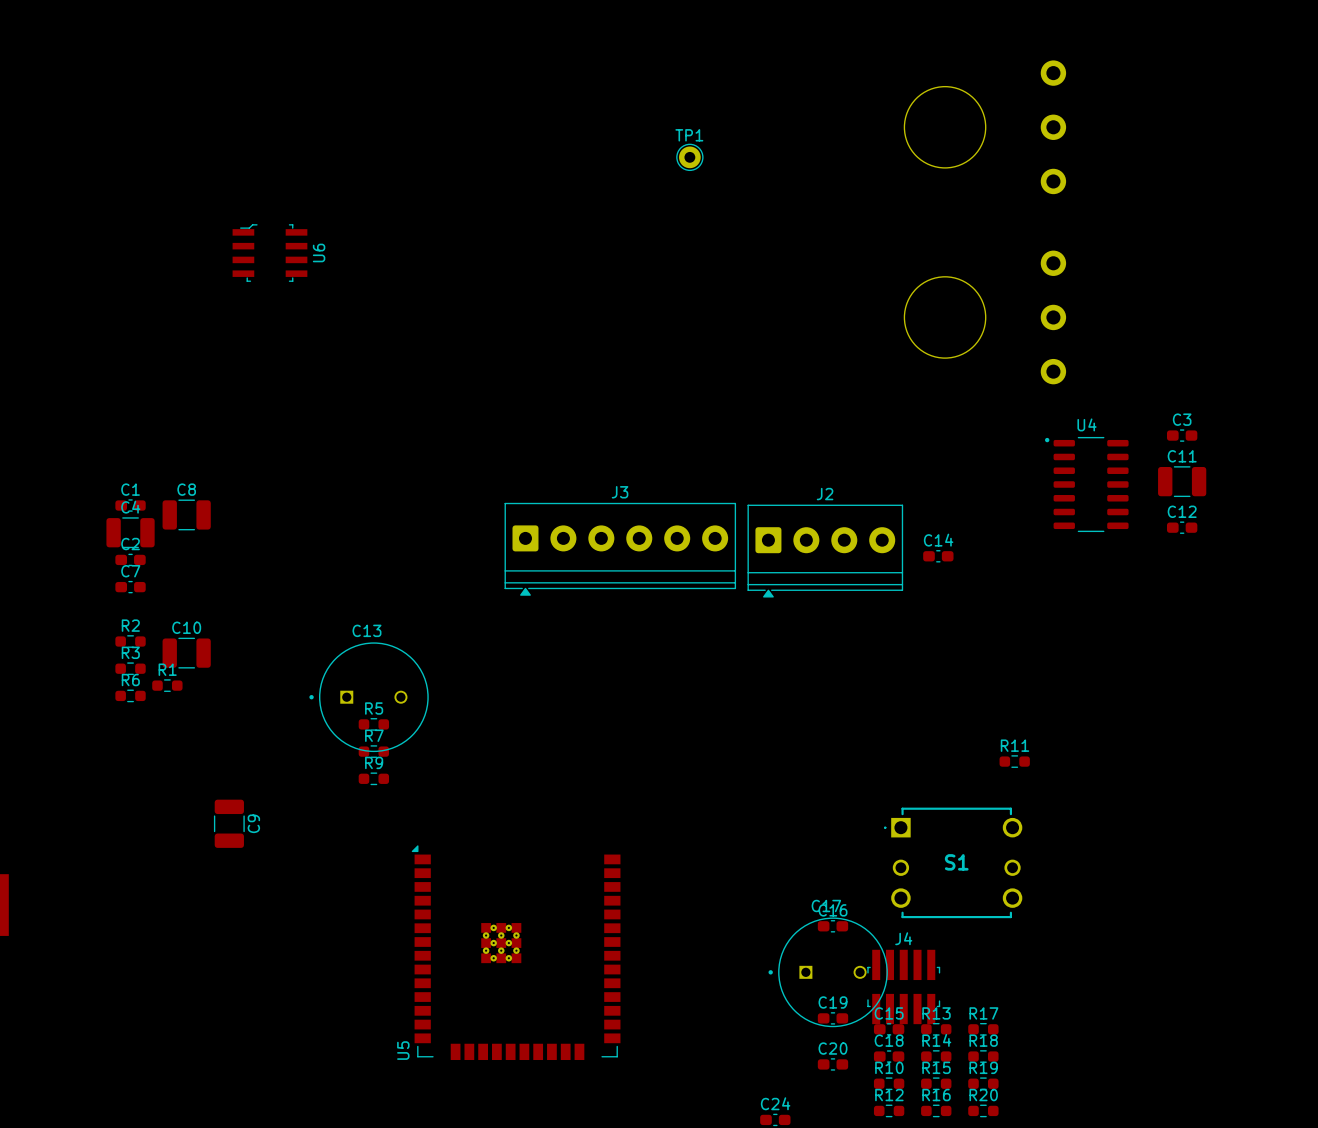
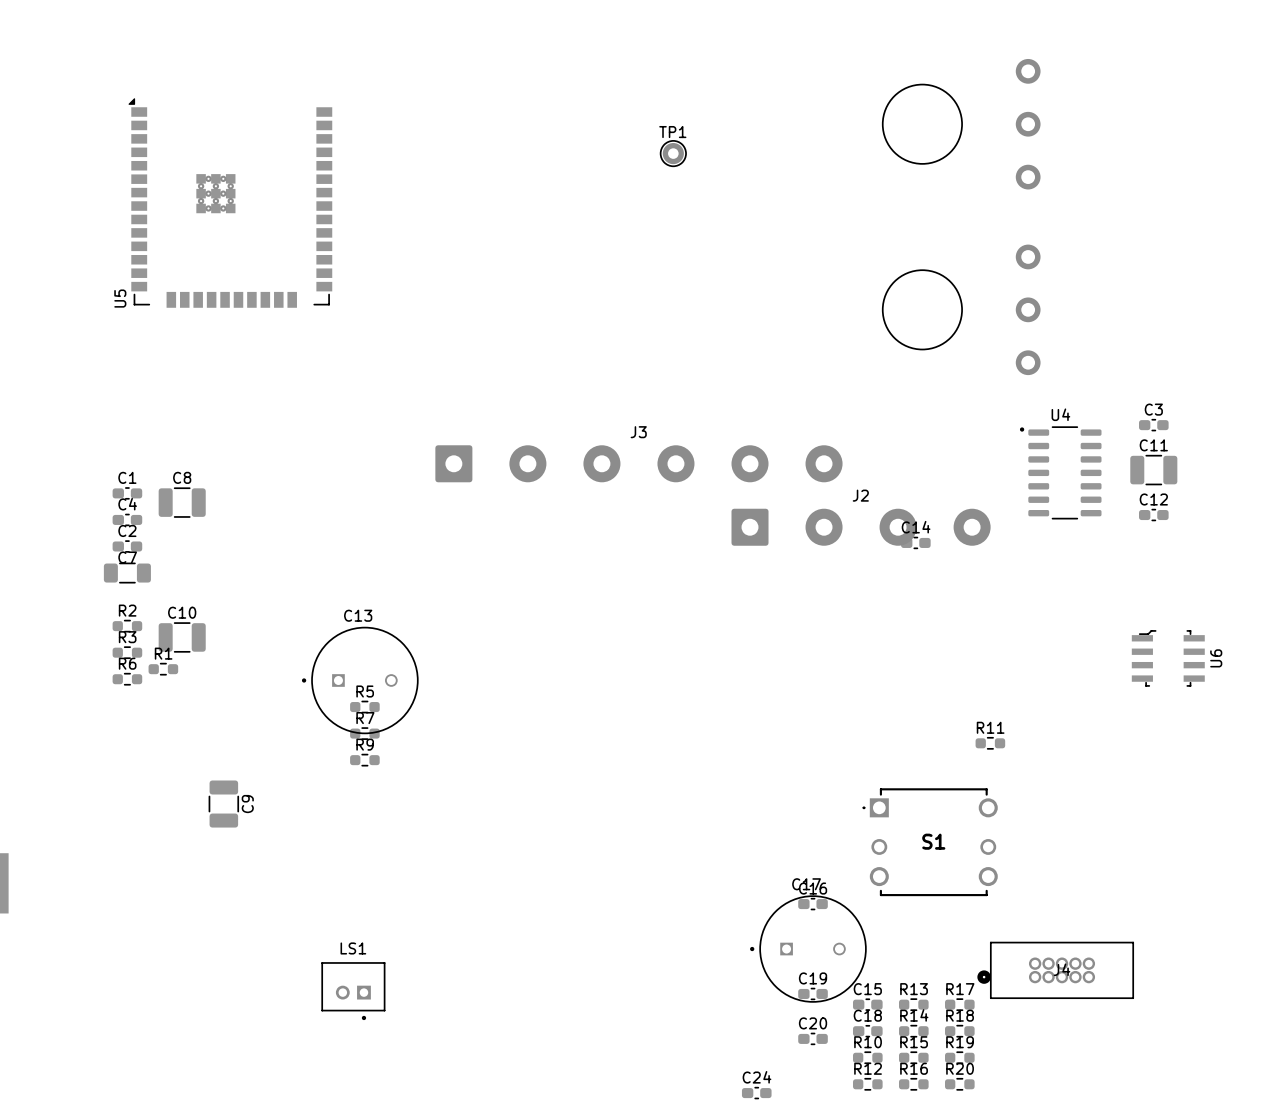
U6 position: (269, 253) -> (1168, 658)
J3 name position: J3 (620, 492) -> J3 (638, 432)
J2 name position: J2 (825, 494) -> J2 (860, 495)
J3 footprint: [504, 502, 737, 596] -> [435, 445, 843, 483]
J2 footprint: [747, 504, 904, 598] -> [731, 508, 991, 546]
C4 footprint: [106, 517, 155, 549] -> [112, 513, 143, 526]
C7 footprint: [115, 580, 146, 594] -> [103, 562, 151, 584]
J4 name position: J4 (903, 938) -> J4 (1062, 969)
J4 footprint: [867, 949, 941, 1025] -> [977, 941, 1135, 999]
U5 position: (516, 952) -> (230, 203)
LS1: none -> (353, 991)

